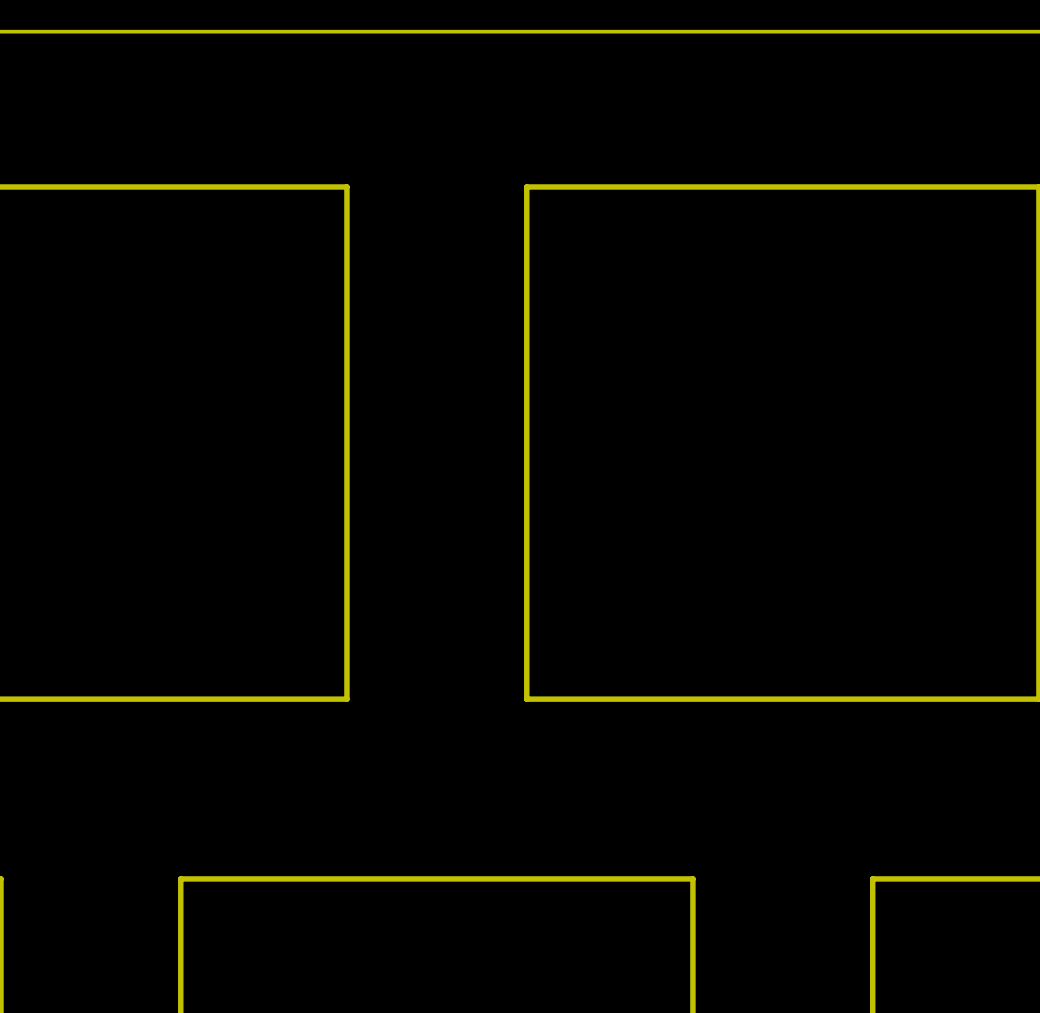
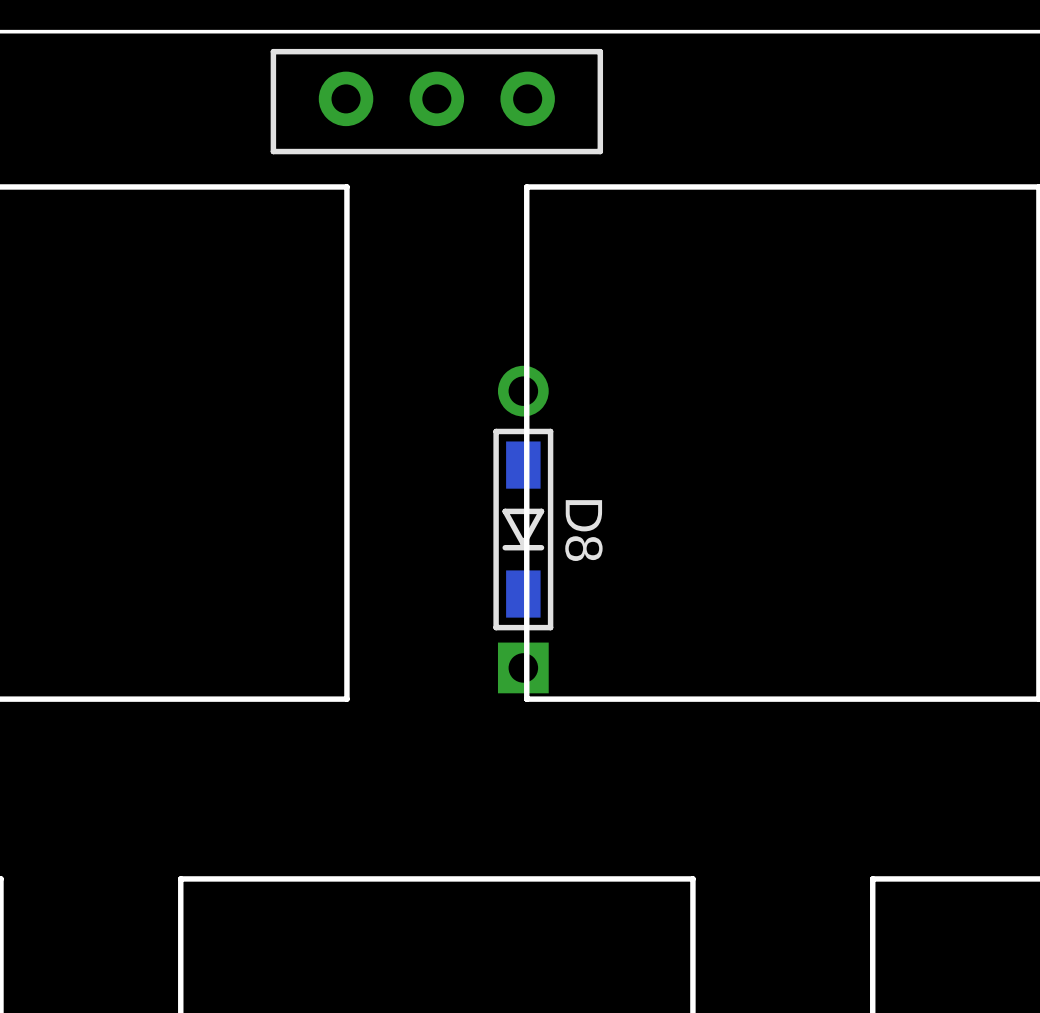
part: none -> (436, 101)
D8: none -> (523, 529)

